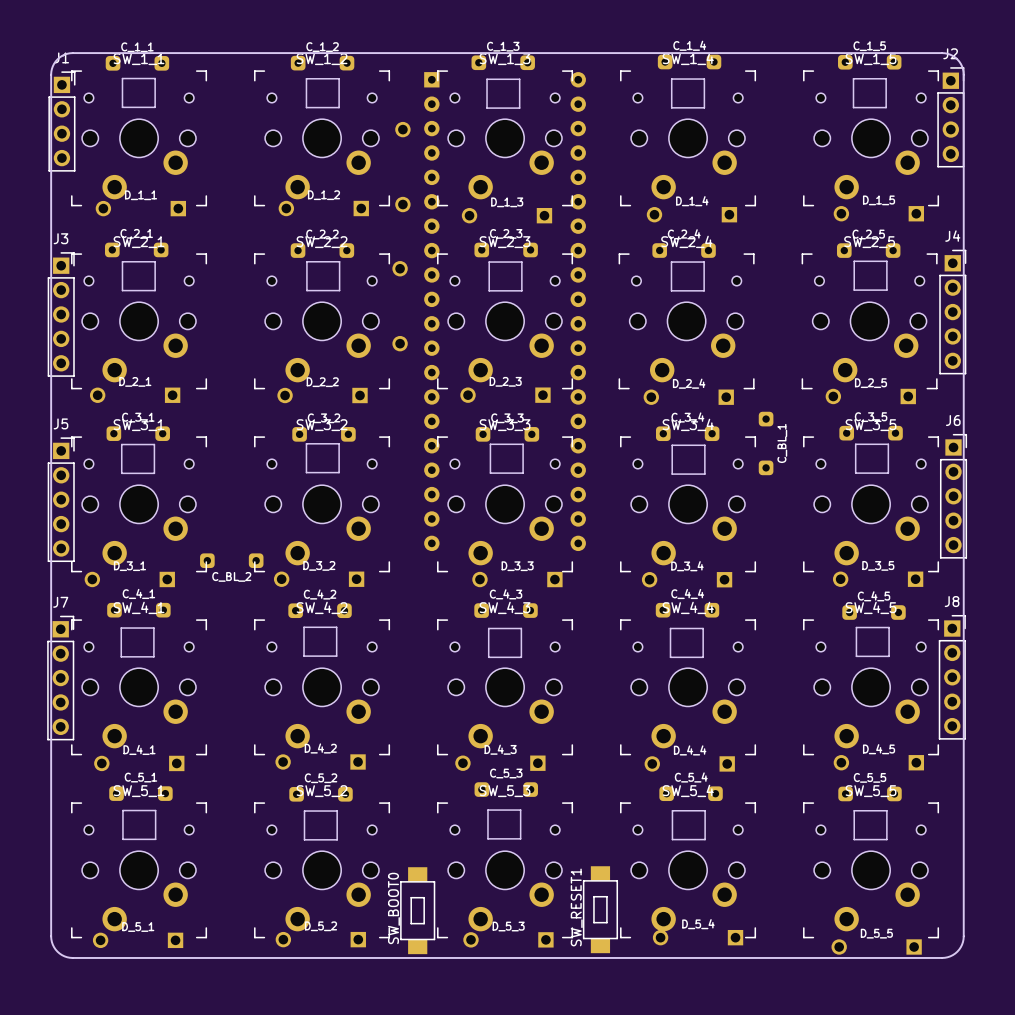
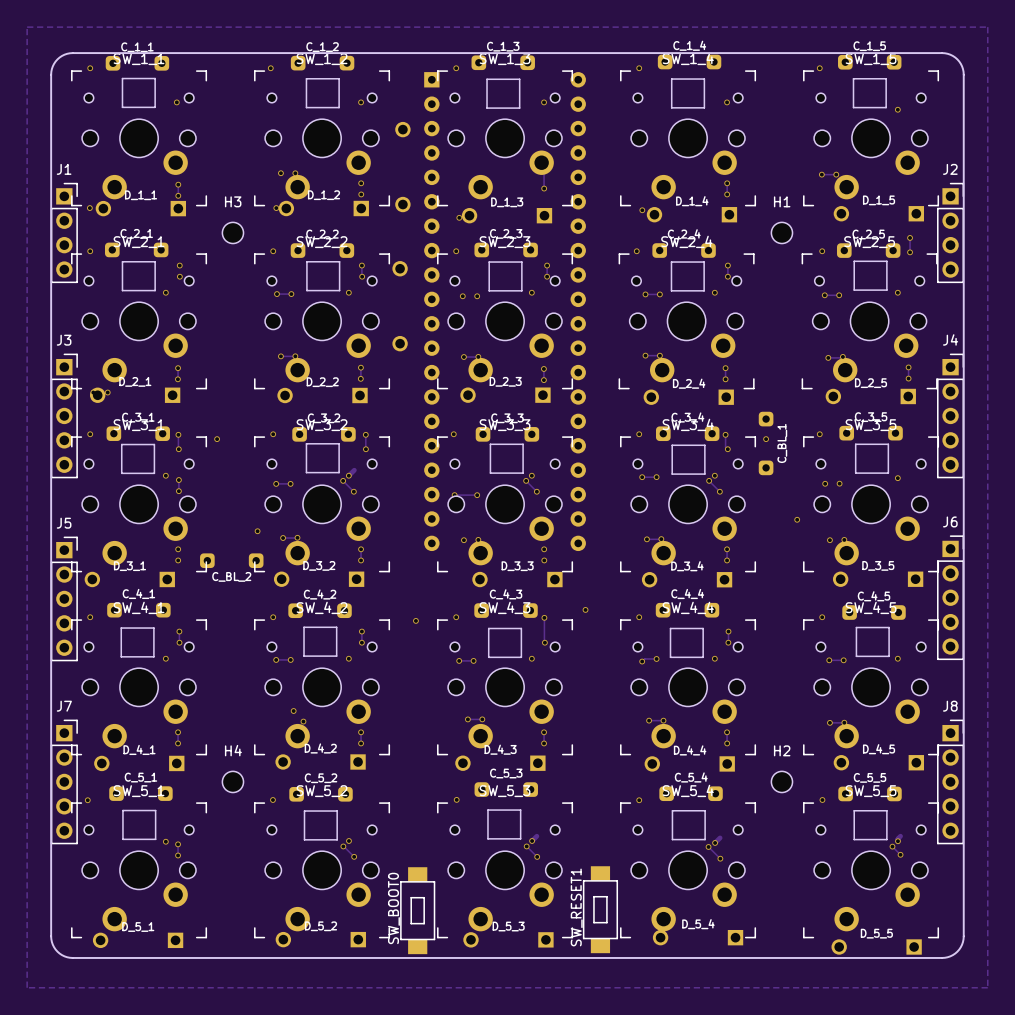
zone outline: none -> (27, 27) (27, 987) (987, 987) (987, 27) (27, 27)
via: none -> (90, 68)
via: none -> (270, 68)
via: none -> (456, 68)
via: none -> (639, 68)
via: none -> (819, 68)
via: none -> (176, 102)
via: none -> (361, 102)
via: none -> (544, 102)
via: none -> (727, 102)
via: none -> (897, 109)
J2 position: (950, 117) -> (950, 232)
J1 position: (61, 121) -> (64, 232)
track: none -> (544, 165) (544, 188)
via: none -> (280, 173)
via: none -> (295, 173)
track: none -> (821, 174) (836, 174)
via: none -> (821, 174)
via: none -> (836, 174)
via: none -> (361, 183)
track: none -> (727, 183) (727, 194)
via: none -> (727, 183)
track: none -> (178, 184) (178, 195)
via: none -> (178, 184)
via: none -> (544, 188)
via: none -> (361, 194)
via: none -> (727, 194)
via: none -> (178, 195)
via: none -> (89, 208)
via: none -> (276, 208)
via: none -> (642, 210)
via: none -> (459, 217)
H3: none -> (232, 232)
H1: none -> (781, 232)
track: none -> (910, 237) (910, 252)
via: none -> (910, 237)
via: none -> (90, 251)
via: none -> (273, 251)
via: none -> (456, 251)
via: none -> (636, 251)
via: none -> (822, 251)
via: none -> (910, 252)
via: none -> (179, 265)
track: none -> (361, 265) (362, 276)
via: none -> (361, 265)
track: none -> (547, 265) (547, 276)
via: none -> (547, 265)
track: none -> (727, 265) (727, 276)
via: none -> (727, 265)
via: none -> (179, 276)
via: none -> (362, 276)
via: none -> (547, 276)
via: none -> (727, 276)
via: none -> (165, 292)
via: none -> (348, 292)
via: none -> (531, 292)
via: none -> (714, 292)
via: none -> (897, 292)
track: none -> (276, 294) (291, 294)
via: none -> (276, 294)
via: none -> (291, 294)
track: none -> (645, 294) (659, 294)
via: none -> (645, 294)
via: none -> (659, 294)
track: none -> (824, 295) (839, 295)
via: none -> (824, 295)
via: none -> (839, 295)
via: none -> (462, 296)
via: none -> (477, 296)
J4 position: (952, 312) -> (950, 415)
J3 position: (61, 314) -> (64, 415)
track: none -> (645, 355) (659, 355)
via: none -> (645, 355)
via: none -> (659, 355)
track: none -> (280, 356) (295, 356)
via: none -> (280, 356)
via: none -> (295, 356)
via: none -> (478, 356)
track: none -> (842, 356) (828, 357)
via: none -> (842, 356)
track: none -> (463, 357) (478, 357)
via: none -> (463, 357)
via: none -> (828, 357)
track: none -> (360, 367) (360, 378)
via: none -> (360, 367)
track: none -> (908, 367) (908, 378)
via: none -> (908, 367)
track: none -> (178, 368) (178, 379)
via: none -> (178, 368)
track: none -> (543, 368) (543, 380)
via: none -> (543, 368)
track: none -> (725, 368) (725, 379)
via: none -> (725, 368)
via: none -> (360, 378)
via: none -> (908, 378)
via: none -> (177, 379)
via: none -> (725, 379)
via: none -> (543, 380)
via: none -> (93, 392)
via: none -> (107, 392)
via: none -> (90, 434)
track: none -> (178, 434) (178, 449)
via: none -> (178, 434)
via: none -> (273, 434)
track: none -> (365, 434) (365, 449)
via: none -> (365, 434)
via: none -> (453, 434)
via: none -> (639, 434)
track: none -> (725, 434) (725, 447) (727, 449)
via: none -> (725, 434)
via: none -> (819, 434)
via: none -> (217, 439)
via: none -> (766, 439)
via: none -> (178, 449)
via: none -> (365, 449)
via: none -> (727, 449)
track: none -> (354, 470) (348, 475)
via: none -> (165, 475)
via: none -> (348, 475)
via: none -> (531, 475)
via: none -> (714, 475)
track: none -> (642, 477) (656, 477)
via: none -> (642, 477)
via: none -> (656, 477)
via: none -> (897, 478)
track: none -> (178, 480) (178, 491)
via: none -> (178, 480)
track: none -> (343, 480) (353, 491)
via: none -> (343, 480)
track: none -> (526, 480) (536, 491)
via: none -> (526, 480)
track: none -> (709, 480) (719, 491)
via: none -> (709, 480)
track: none -> (276, 483) (290, 483)
via: none -> (276, 483)
via: none -> (290, 483)
via: none -> (825, 483)
via: none -> (839, 483)
via: none -> (178, 491)
via: none -> (353, 491)
via: none -> (536, 491)
via: none -> (719, 491)
track: none -> (454, 495) (477, 495)
via: none -> (454, 495)
via: none -> (477, 495)
J6 position: (953, 496) -> (950, 597)
J5 position: (61, 499) -> (64, 598)
via: none -> (797, 519)
via: none -> (257, 531)
track: none -> (297, 537) (283, 538)
via: none -> (297, 537)
via: none -> (283, 538)
via: none -> (478, 539)
via: none -> (646, 539)
track: none -> (661, 539) (646, 539)
via: none -> (661, 539)
via: none -> (844, 539)
via: none -> (463, 540)
via: none -> (829, 540)
via: none -> (178, 549)
track: none -> (361, 549) (361, 560)
via: none -> (361, 549)
via: none -> (544, 549)
track: none -> (727, 549) (727, 560)
via: none -> (727, 549)
via: none -> (178, 560)
via: none -> (361, 560)
via: none -> (544, 560)
via: none -> (727, 560)
via: none -> (585, 609)
via: none -> (90, 617)
via: none -> (273, 617)
via: none -> (456, 617)
track: none -> (544, 617) (544, 642)
via: none -> (544, 617)
via: none -> (639, 617)
via: none -> (822, 617)
via: none -> (415, 620)
track: none -> (179, 631) (179, 642)
via: none -> (179, 631)
track: none -> (361, 631) (361, 642)
via: none -> (361, 631)
track: none -> (728, 631) (728, 642)
via: none -> (728, 631)
via: none -> (179, 642)
via: none -> (361, 642)
via: none -> (544, 642)
via: none -> (728, 642)
via: none -> (165, 658)
via: none -> (348, 658)
via: none -> (531, 658)
track: none -> (656, 658) (644, 658) (642, 661)
via: none -> (656, 658)
via: none -> (714, 658)
via: none -> (897, 658)
track: none -> (276, 659) (290, 659)
via: none -> (276, 659)
via: none -> (290, 659)
track: none -> (459, 660) (473, 660)
via: none -> (459, 660)
via: none -> (473, 660)
track: none -> (829, 660) (843, 660)
via: none -> (829, 660)
via: none -> (843, 660)
via: none -> (642, 661)
J8 position: (952, 677) -> (950, 781)
J7 position: (60, 678) -> (64, 781)
via: none -> (293, 711)
track: none -> (467, 719) (482, 719)
via: none -> (467, 719)
via: none -> (482, 719)
track: none -> (649, 720) (663, 720)
via: none -> (649, 720)
via: none -> (663, 720)
via: none -> (303, 721)
via: none -> (829, 722)
track: none -> (844, 722) (829, 722)
via: none -> (844, 722)
track: none -> (178, 732) (178, 743)
via: none -> (178, 732)
track: none -> (361, 732) (361, 743)
via: none -> (361, 732)
track: none -> (544, 732) (544, 743)
via: none -> (544, 732)
track: none -> (727, 732) (727, 743)
via: none -> (727, 732)
via: none -> (178, 743)
via: none -> (361, 743)
via: none -> (544, 743)
via: none -> (727, 743)
H4: none -> (232, 781)
H2: none -> (781, 781)
via: none -> (456, 799)
via: none -> (87, 800)
via: none -> (272, 800)
via: none -> (639, 800)
via: none -> (822, 800)
track: none -> (536, 836) (532, 840)
track: none -> (900, 836) (897, 841)
track: none -> (720, 837) (715, 842)
via: none -> (348, 840)
via: none -> (532, 840)
via: none -> (165, 841)
via: none -> (897, 841)
via: none -> (715, 842)
track: none -> (178, 844) (178, 855)
via: none -> (178, 844)
track: none -> (343, 846) (354, 856)
via: none -> (343, 846)
track: none -> (526, 846) (537, 856)
via: none -> (526, 846)
track: none -> (708, 846) (720, 858)
via: none -> (708, 846)
track: none -> (892, 846) (900, 854)
via: none -> (892, 846)
via: none -> (900, 854)
via: none -> (178, 855)
via: none -> (354, 856)
via: none -> (537, 856)
via: none -> (720, 858)

